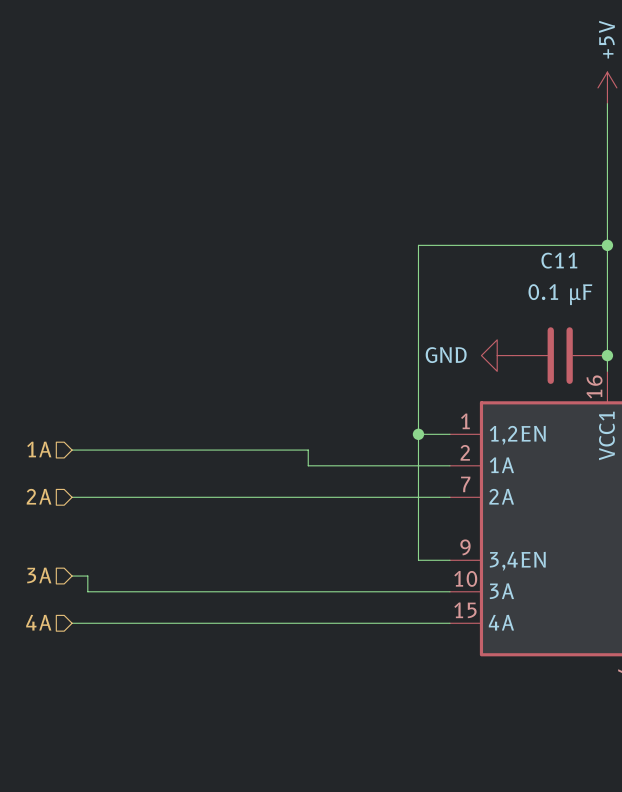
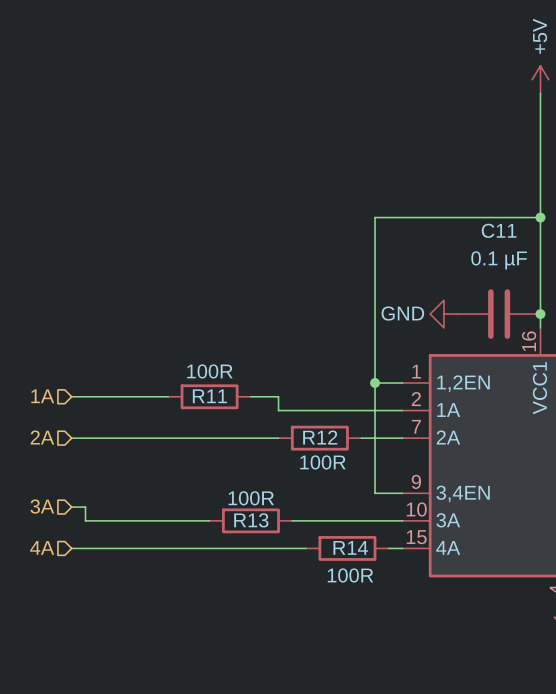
wire: (182, 450) (276, 450) -> none
R11: none -> 100R (209, 396)
wire: (308, 497) (402, 497) -> none
R12: none -> 100R (319, 438)
wire: (229, 591) (324, 591) -> none
R13: none -> 100R (250, 520)
wire: (339, 623) (434, 623) -> none
R14: none -> 100R (347, 548)

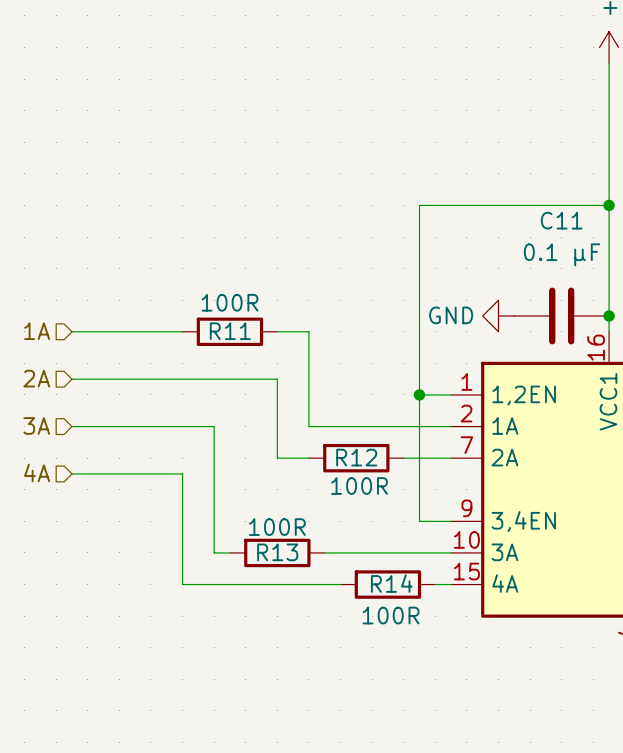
hierarchical label position: 1A (42, 396) -> 1A (37, 331)
wire: (71, 396) (168, 396) -> (71, 331) (182, 331)
R11 position: (209, 396) -> (229, 331)
wire: (250, 396) (278, 396) -> (277, 331) (308, 331) (308, 410)
hierarchical label position: 2A (42, 437) -> 2A (36, 378)
wire: (71, 438) (250, 438) -> (71, 379) (277, 379) (277, 458)
hierarchical label position: 3A (42, 506) -> 3A (36, 425)
wire: (71, 507) (85, 507) (85, 520) (195, 520) -> (71, 426) (214, 426) (214, 552)
hierarchical label position: 4A (42, 547) -> 4A (37, 473)
wire: (71, 548) (168, 548) -> (71, 473) (182, 473) (182, 584)

